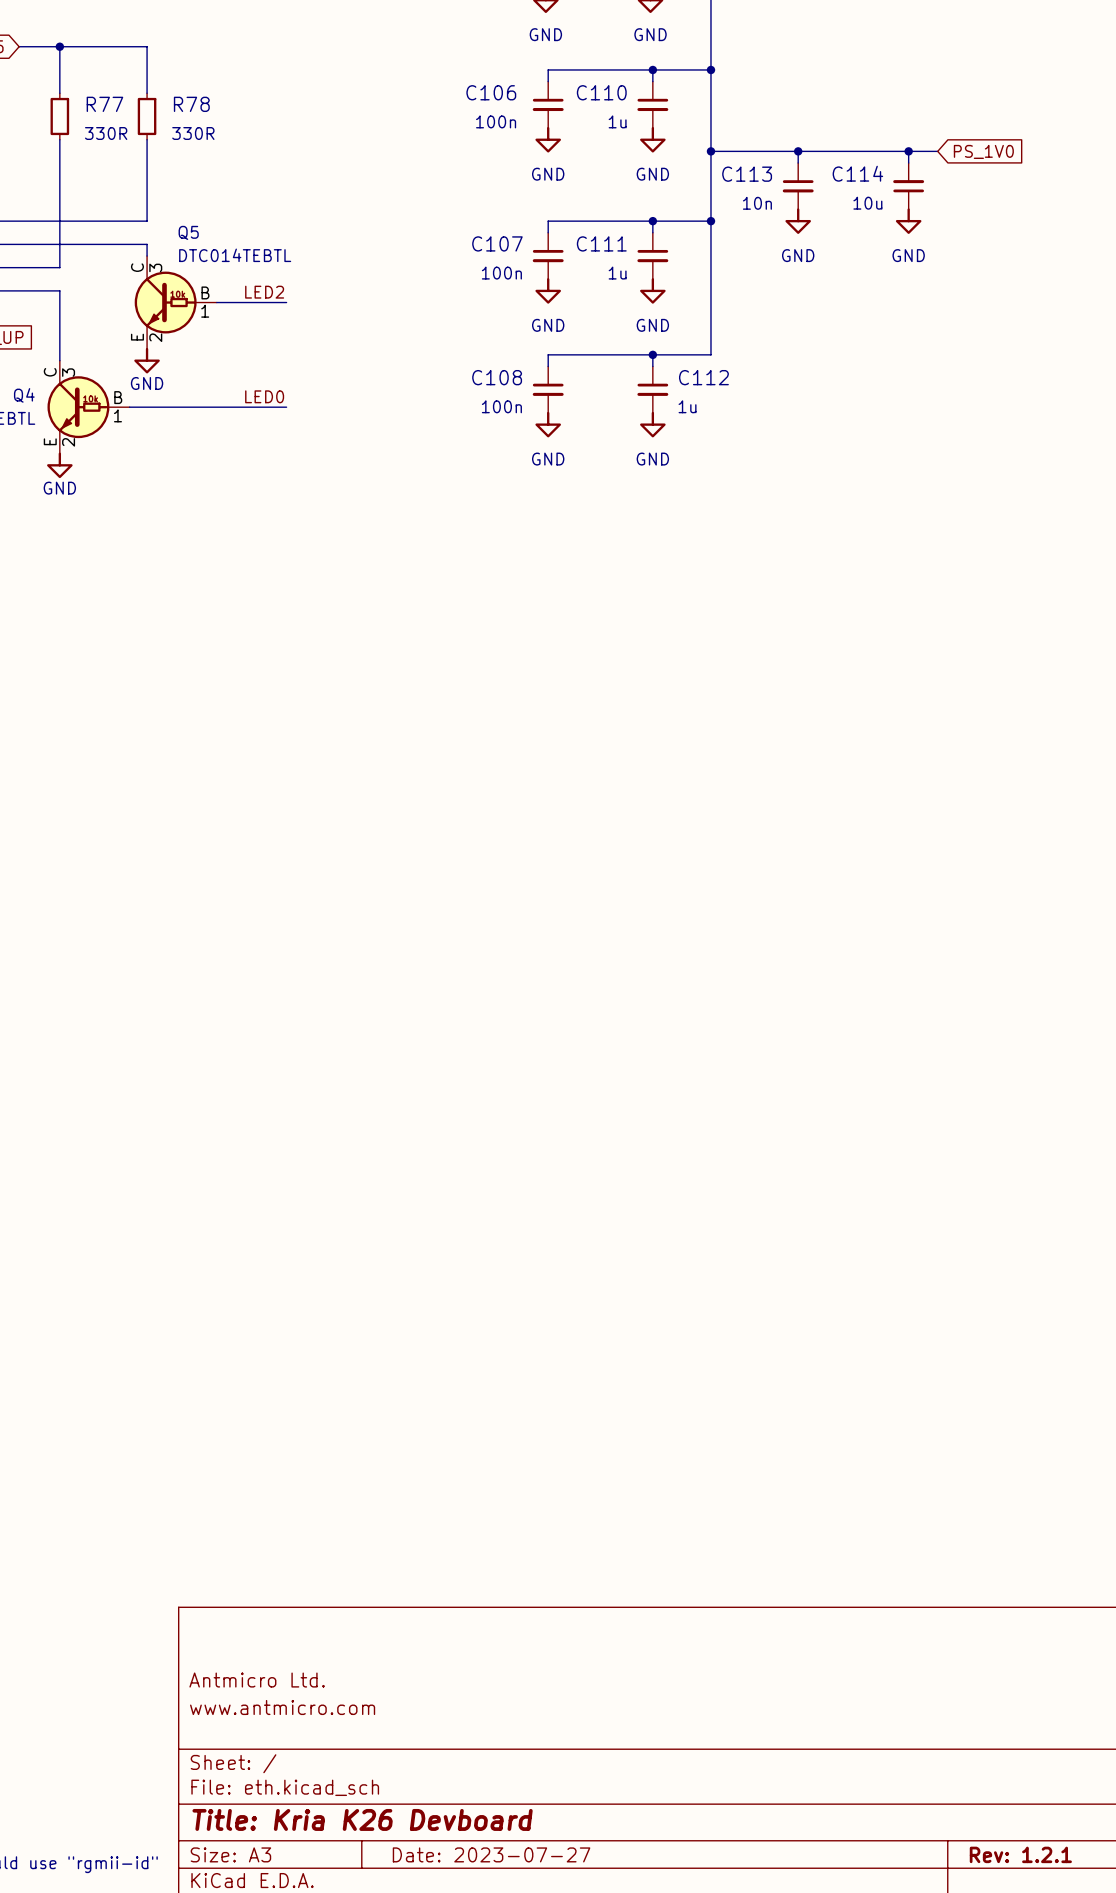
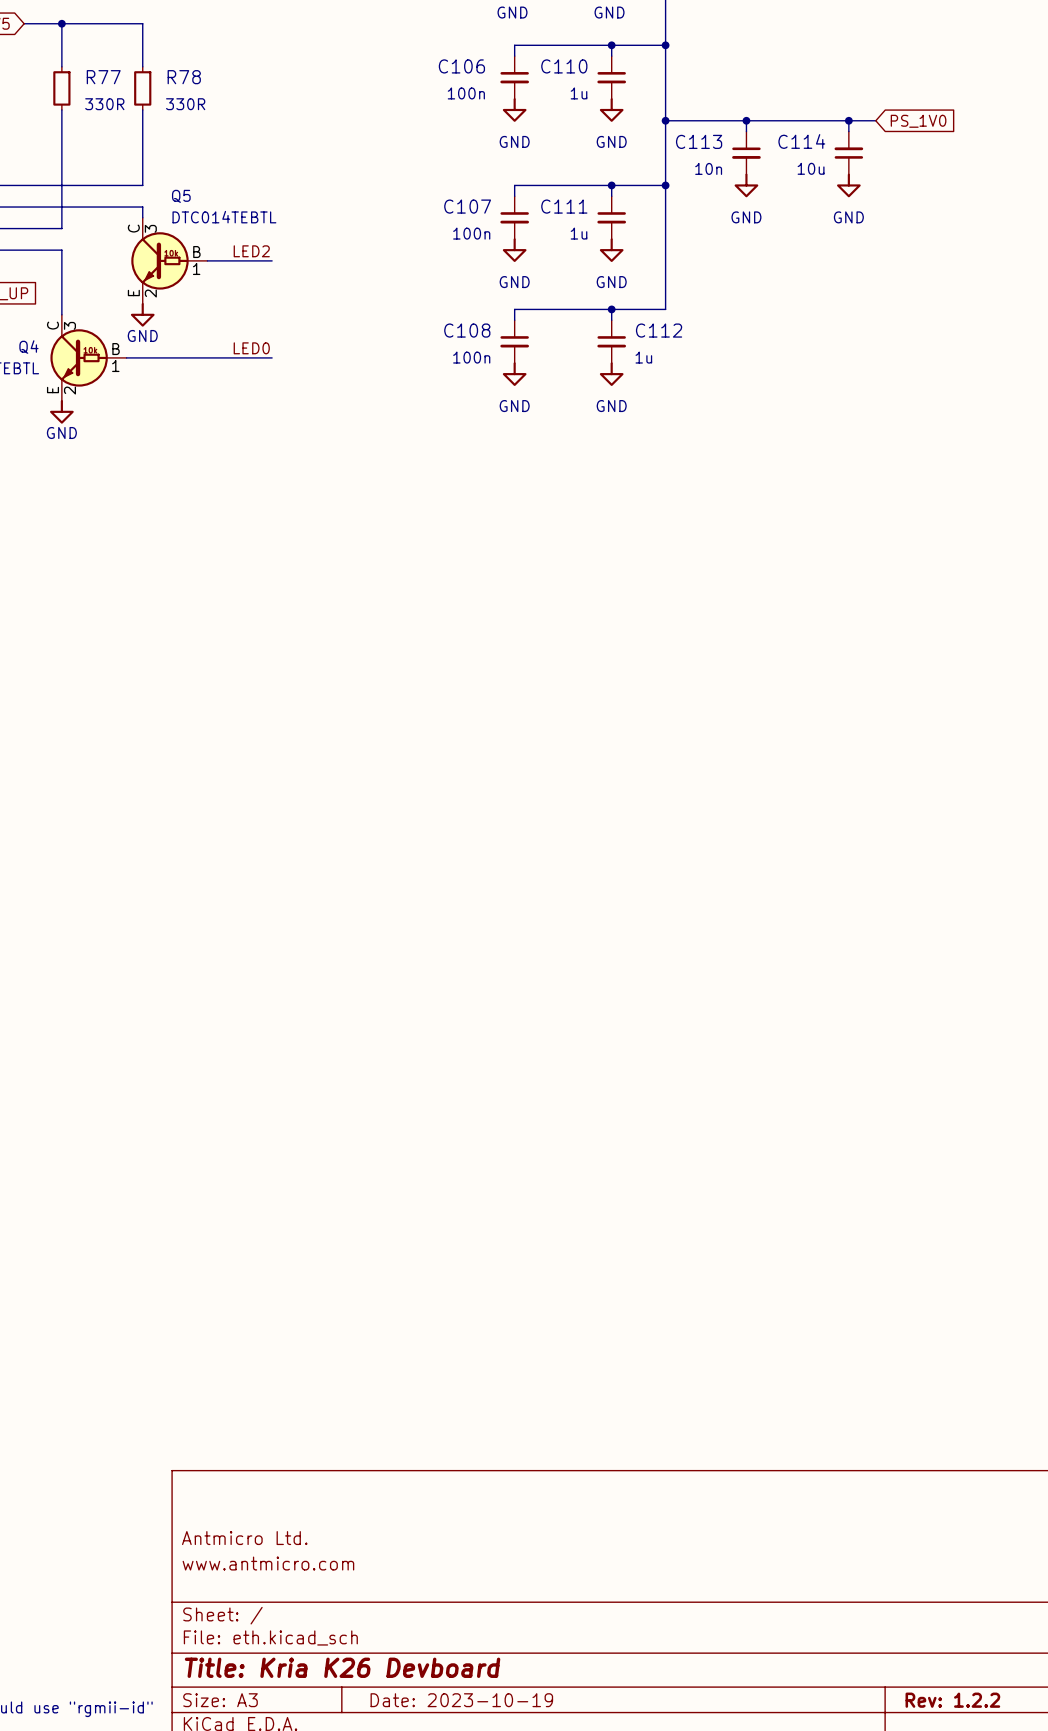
title block: Date: 2023-07-27 (491, 1854) -> Date: 2023-10-19 (461, 1700)
title block: Rev: 1.2.1 (1020, 1854) -> Rev: 1.2.2 (952, 1700)

